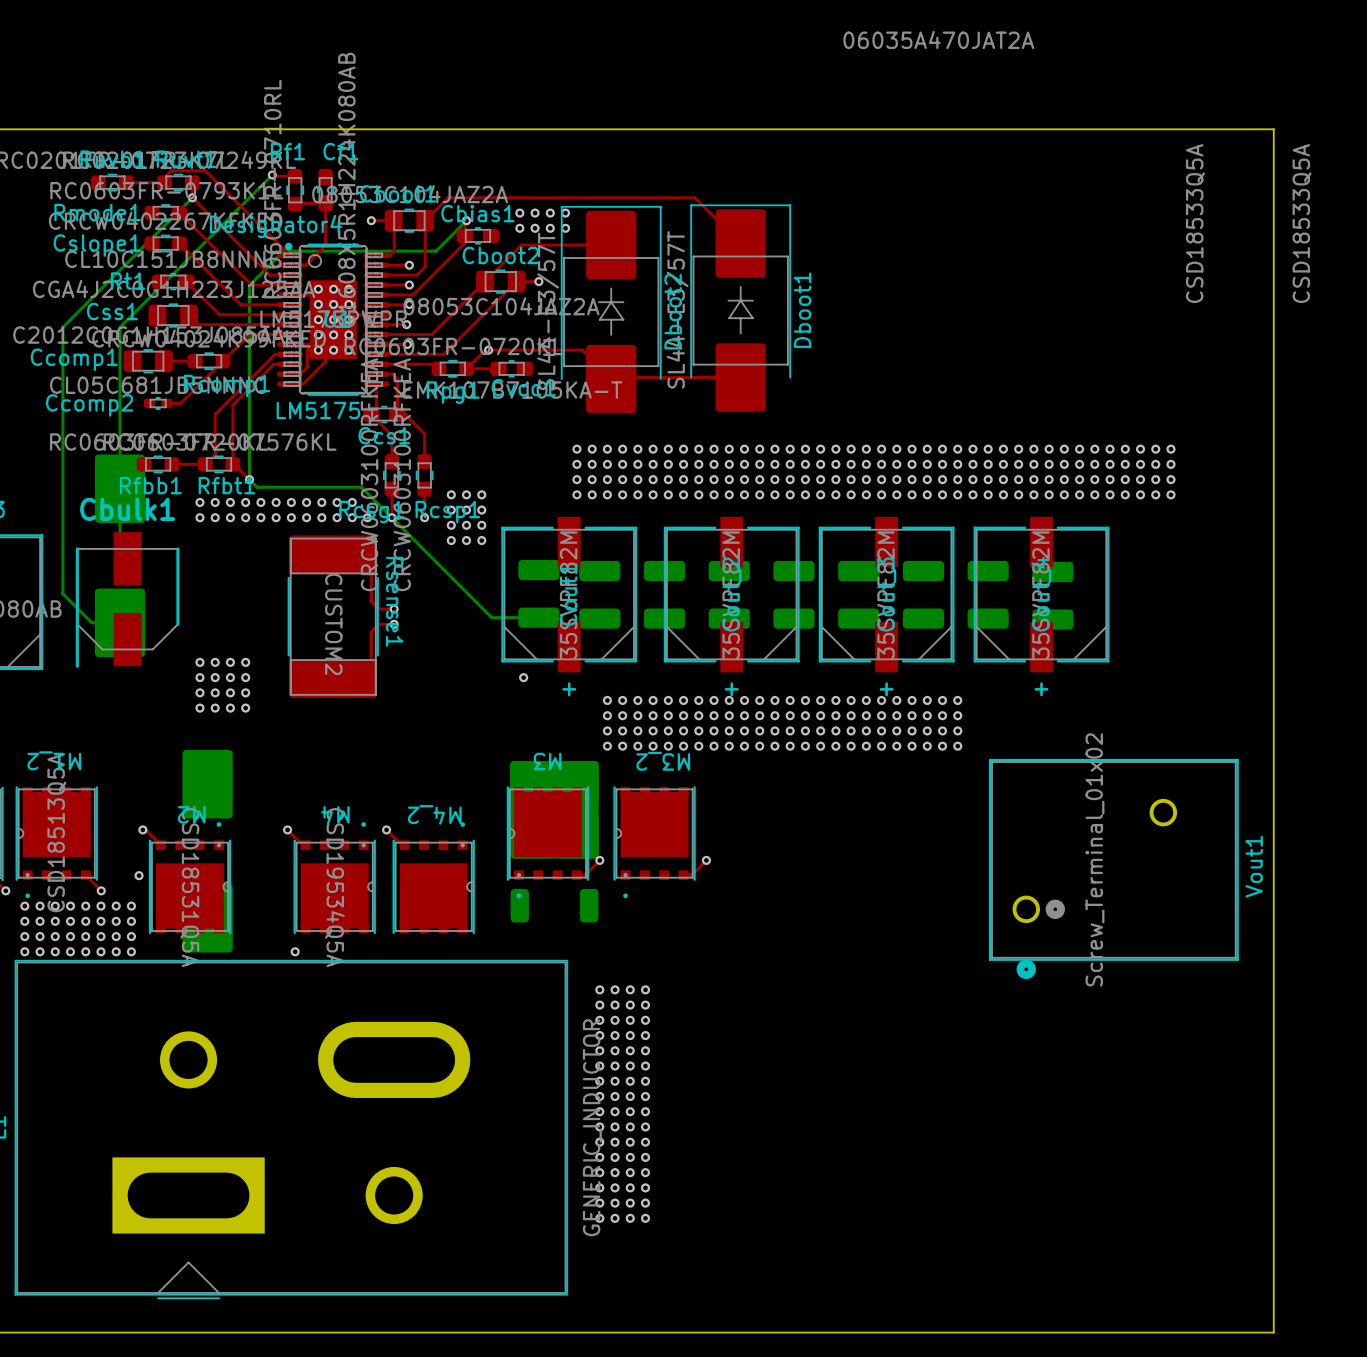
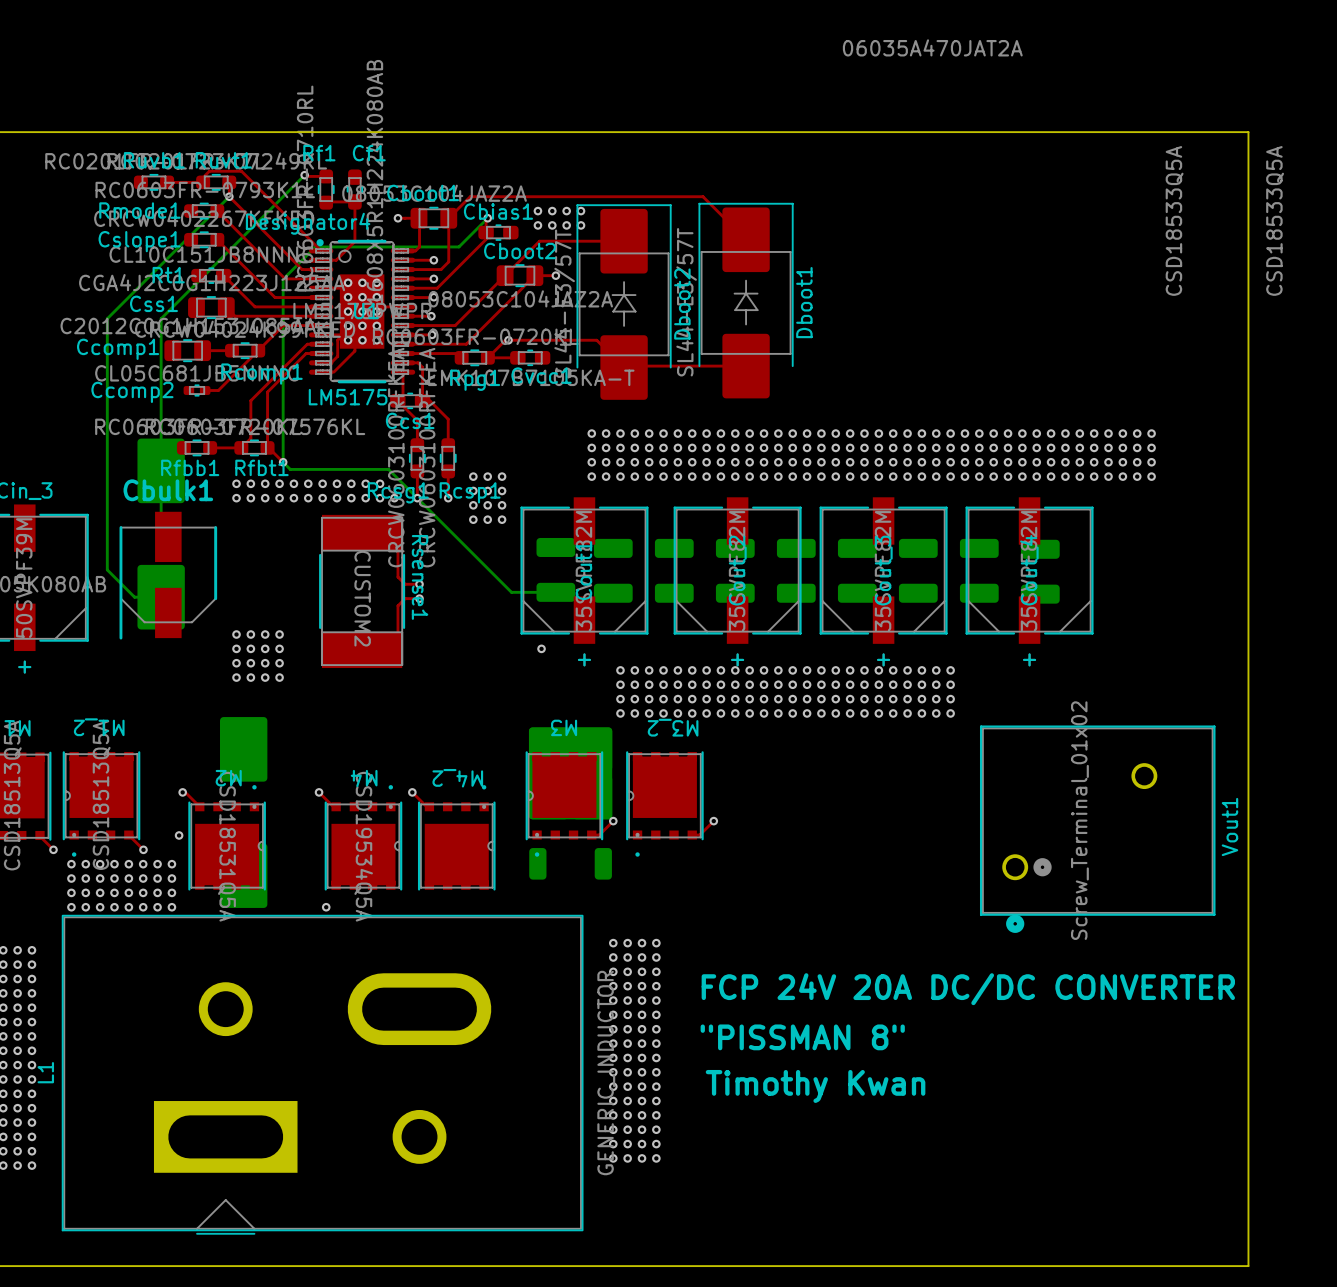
text: none -> FCP 24V 20A DC/DC CONVERTER (968, 989)
text: none -> "PISSMAN 8" (802, 1037)
text: none -> Timothy Kwan (815, 1086)

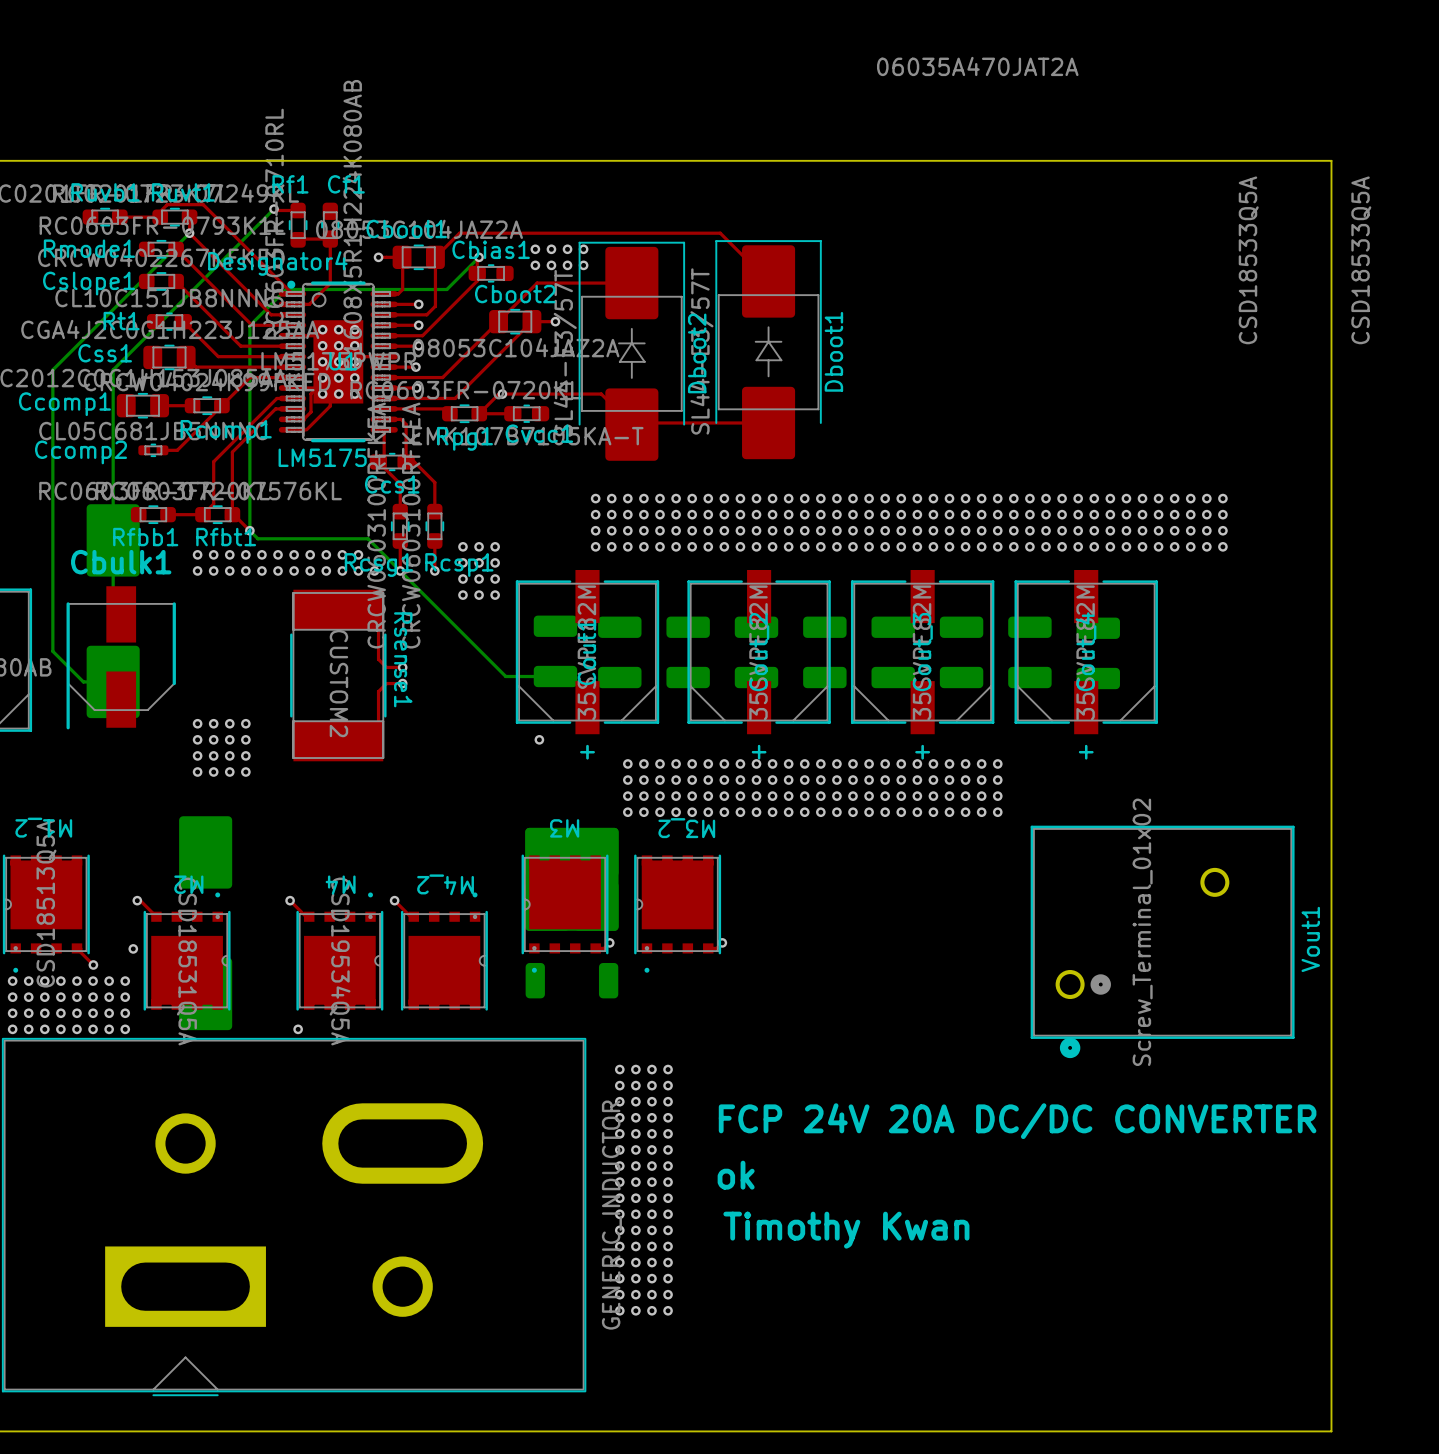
top track: (613, 821) (604, 830) -> none
via: (613, 821) -> none
top track: (713, 821) (704, 830) -> none
via: (713, 821) -> none
via: none -> (609, 942)
via: none -> (722, 942)
text: "PISSMAN 8" (802, 1037) -> ok (736, 1175)

